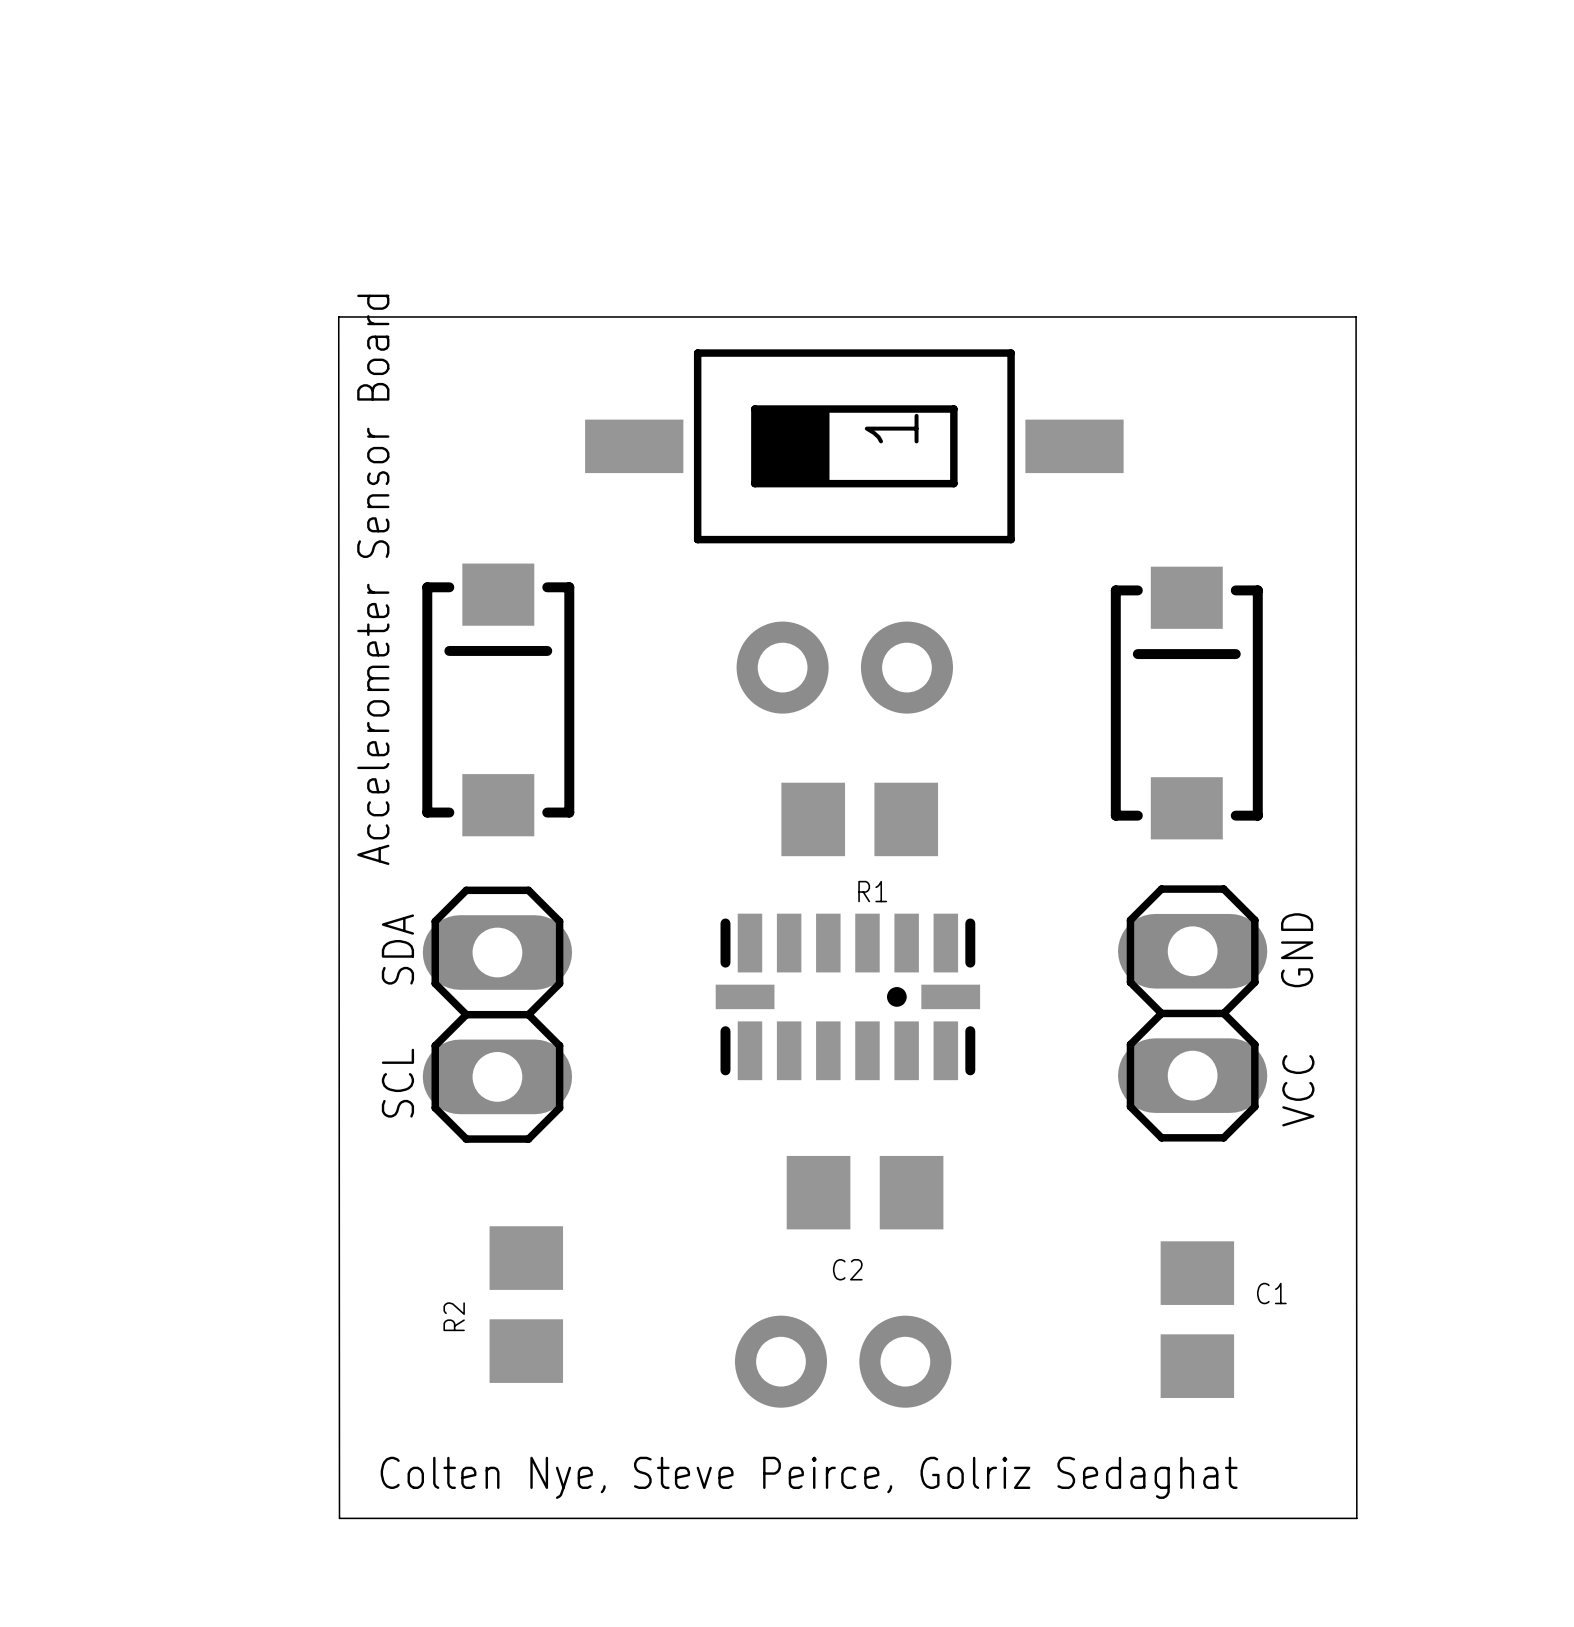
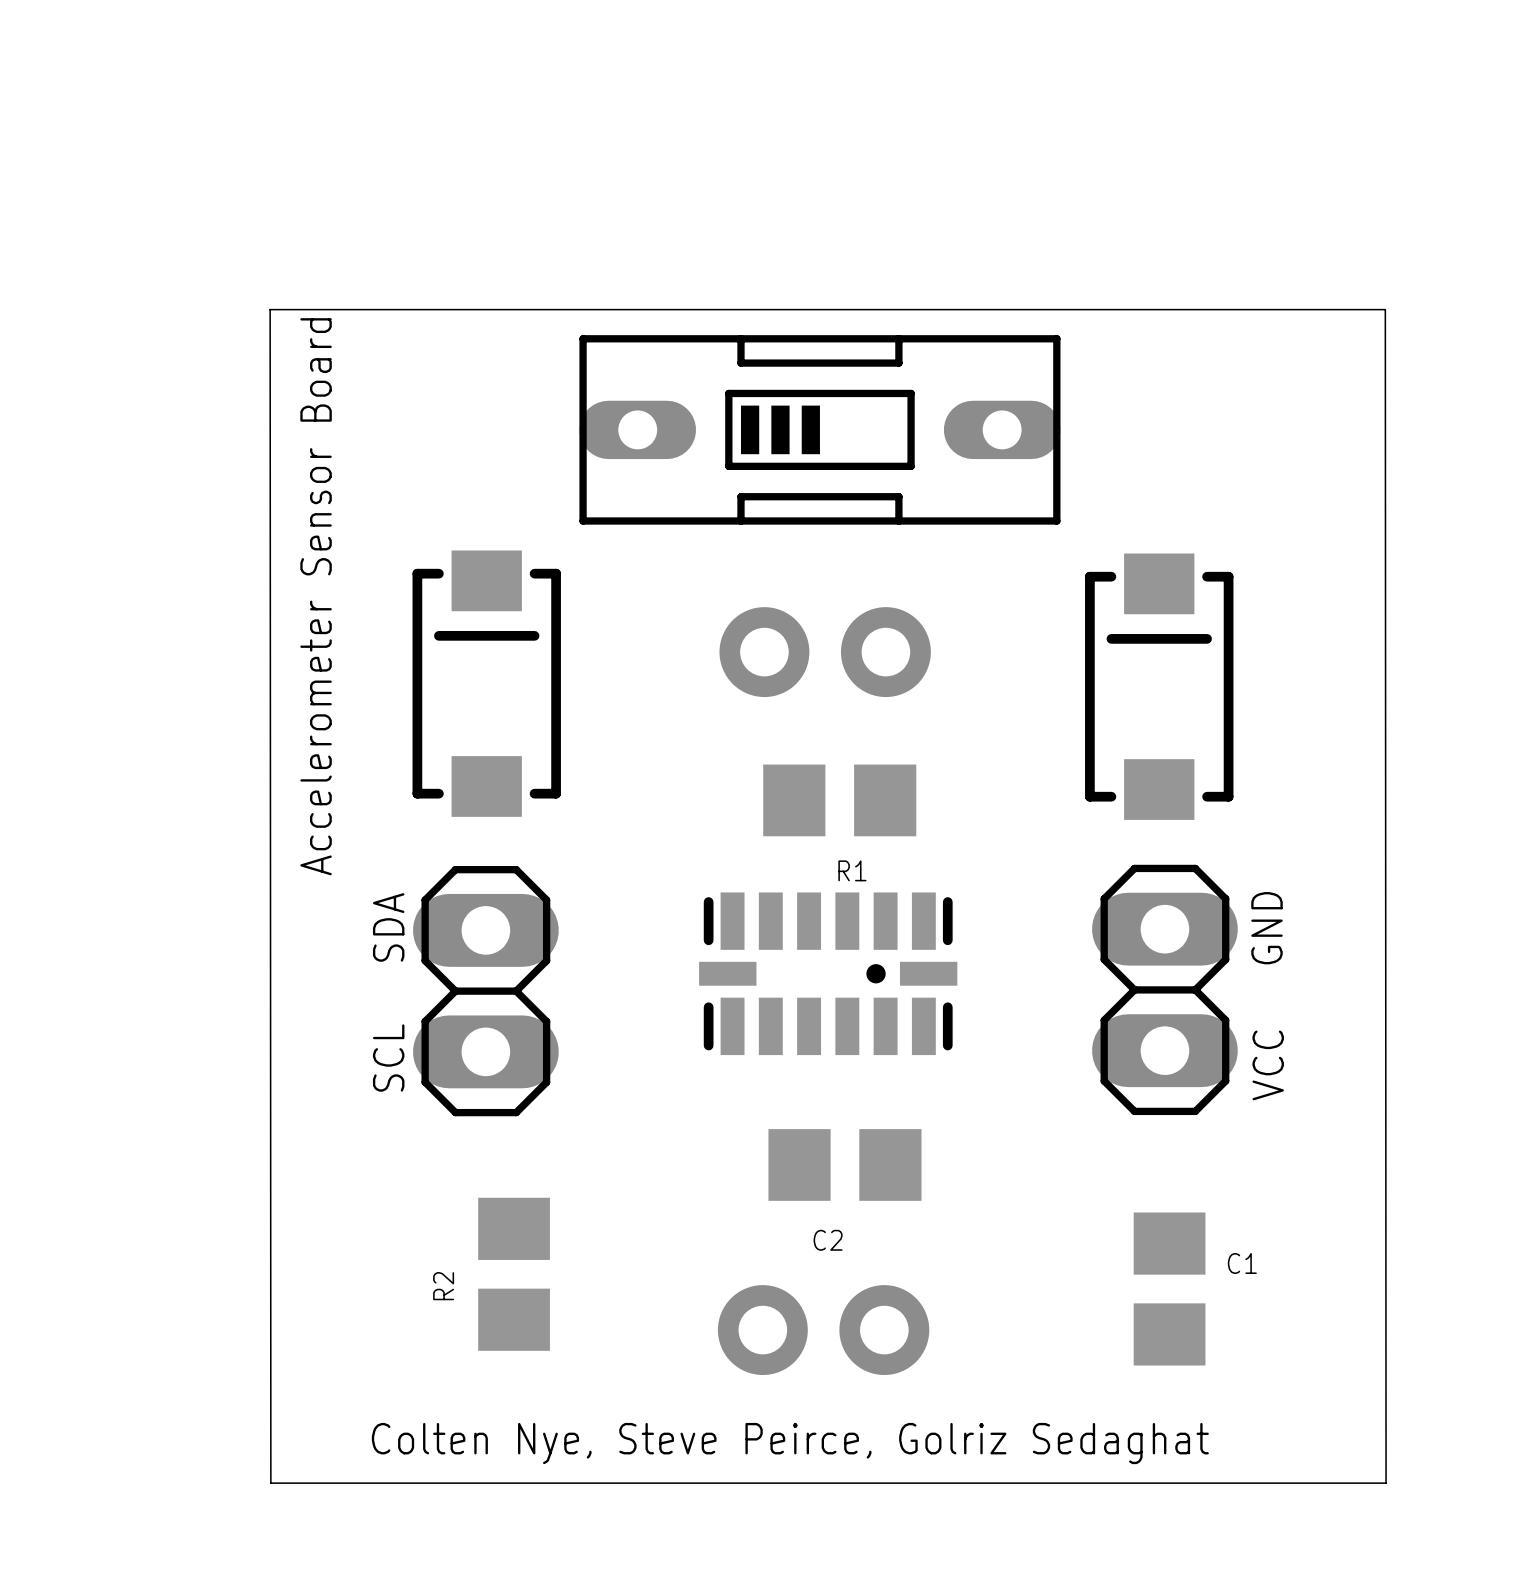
board edge: (338, 316) (339, 1518) -> (330, 309) (270, 309) (270, 1483) (331, 1483)
board edge: (1356, 316) (1356, 1518) -> (1324, 309) (1385, 309) (1386, 1483) (1325, 1483)
part footprint: [585, 349, 1124, 544] -> [579, 335, 1061, 525]
text position: Accelerometer Sensor Board (373, 579) -> Accelerometer Sensor Board (316, 596)

